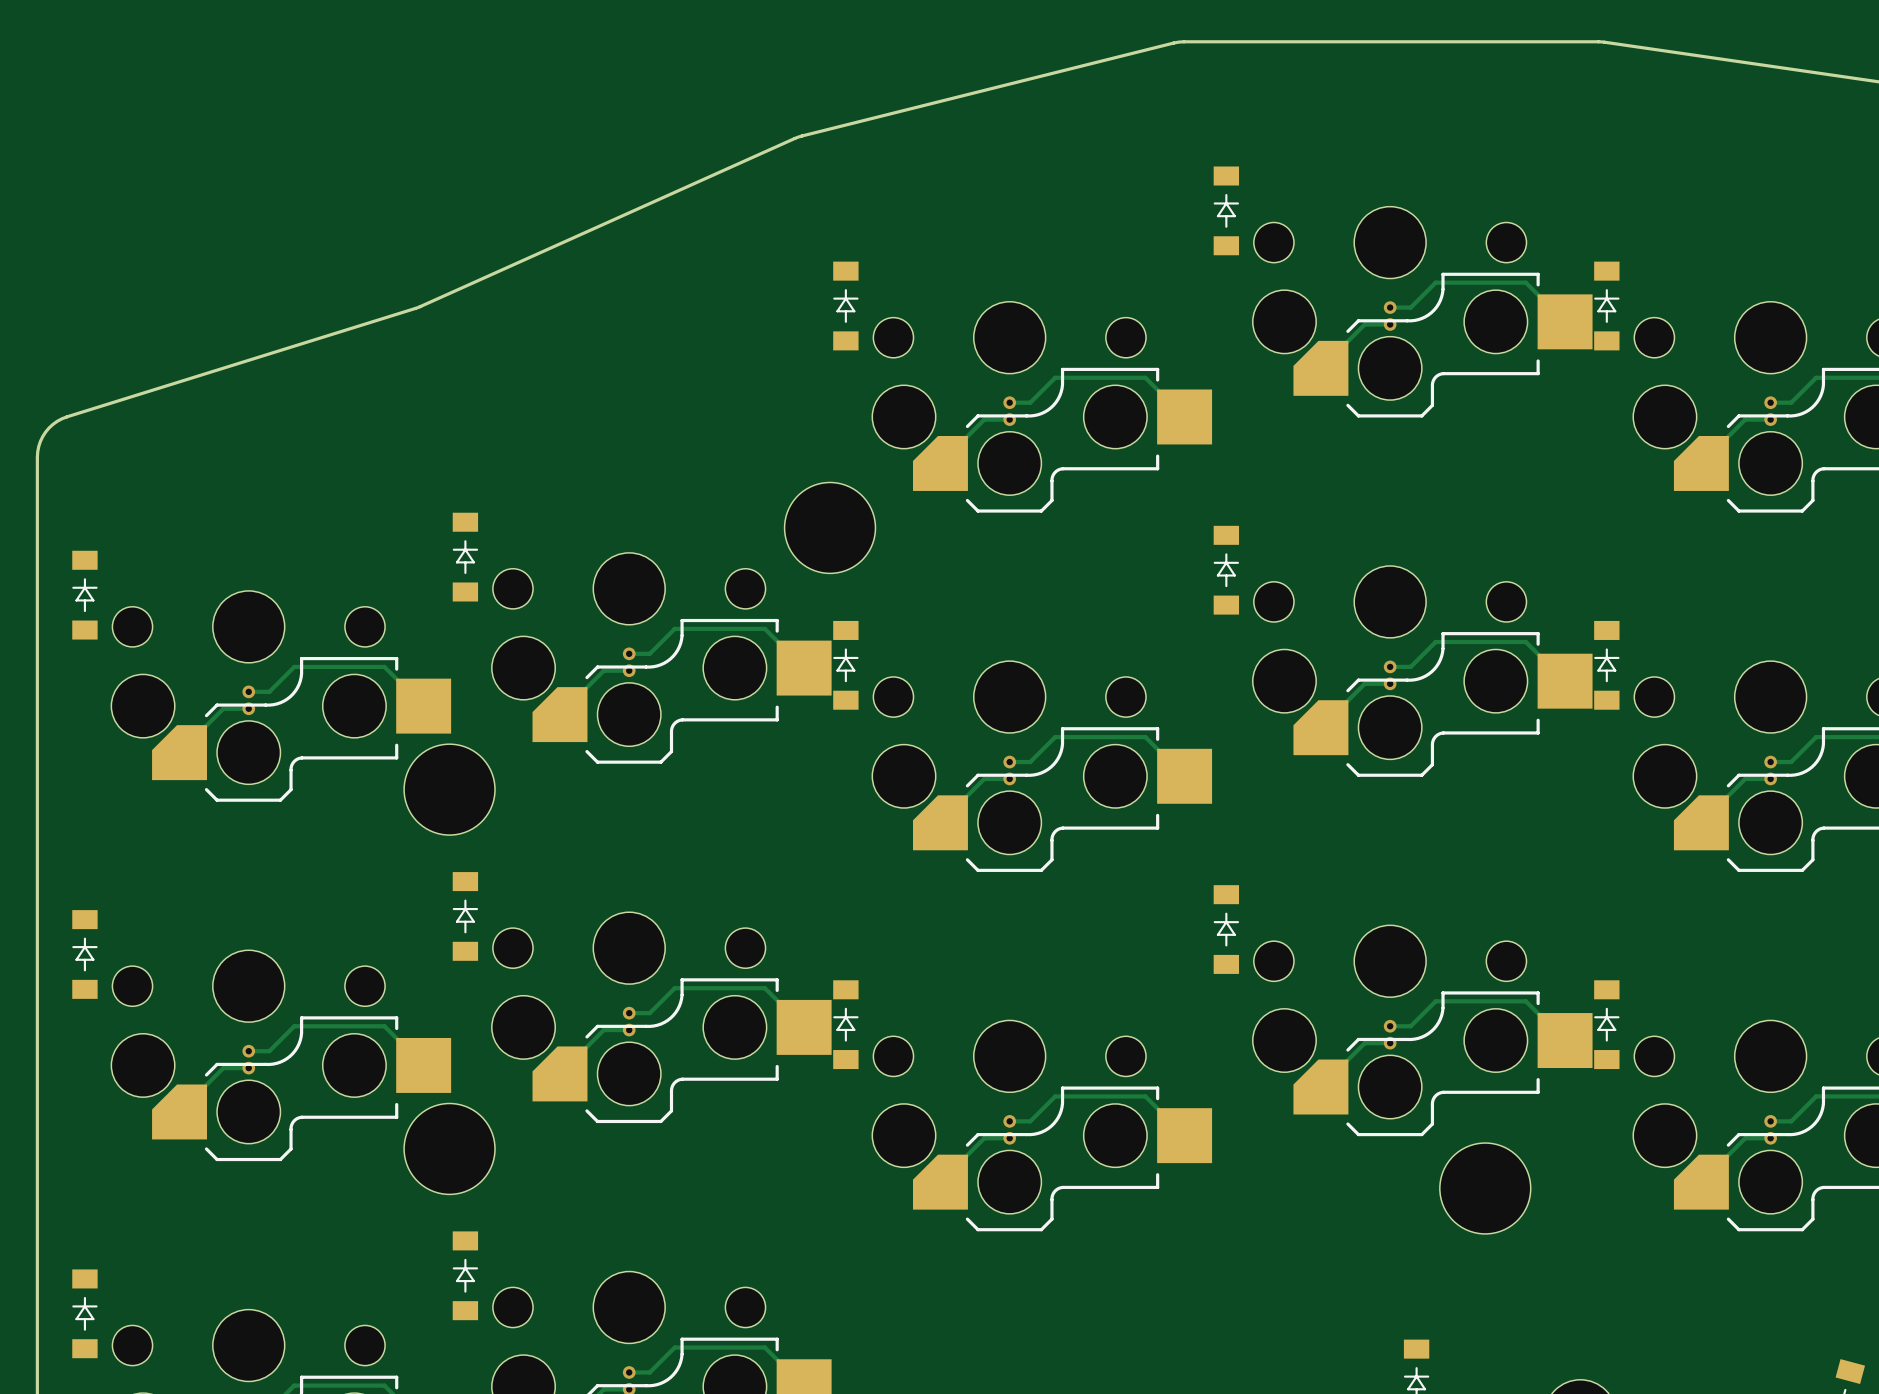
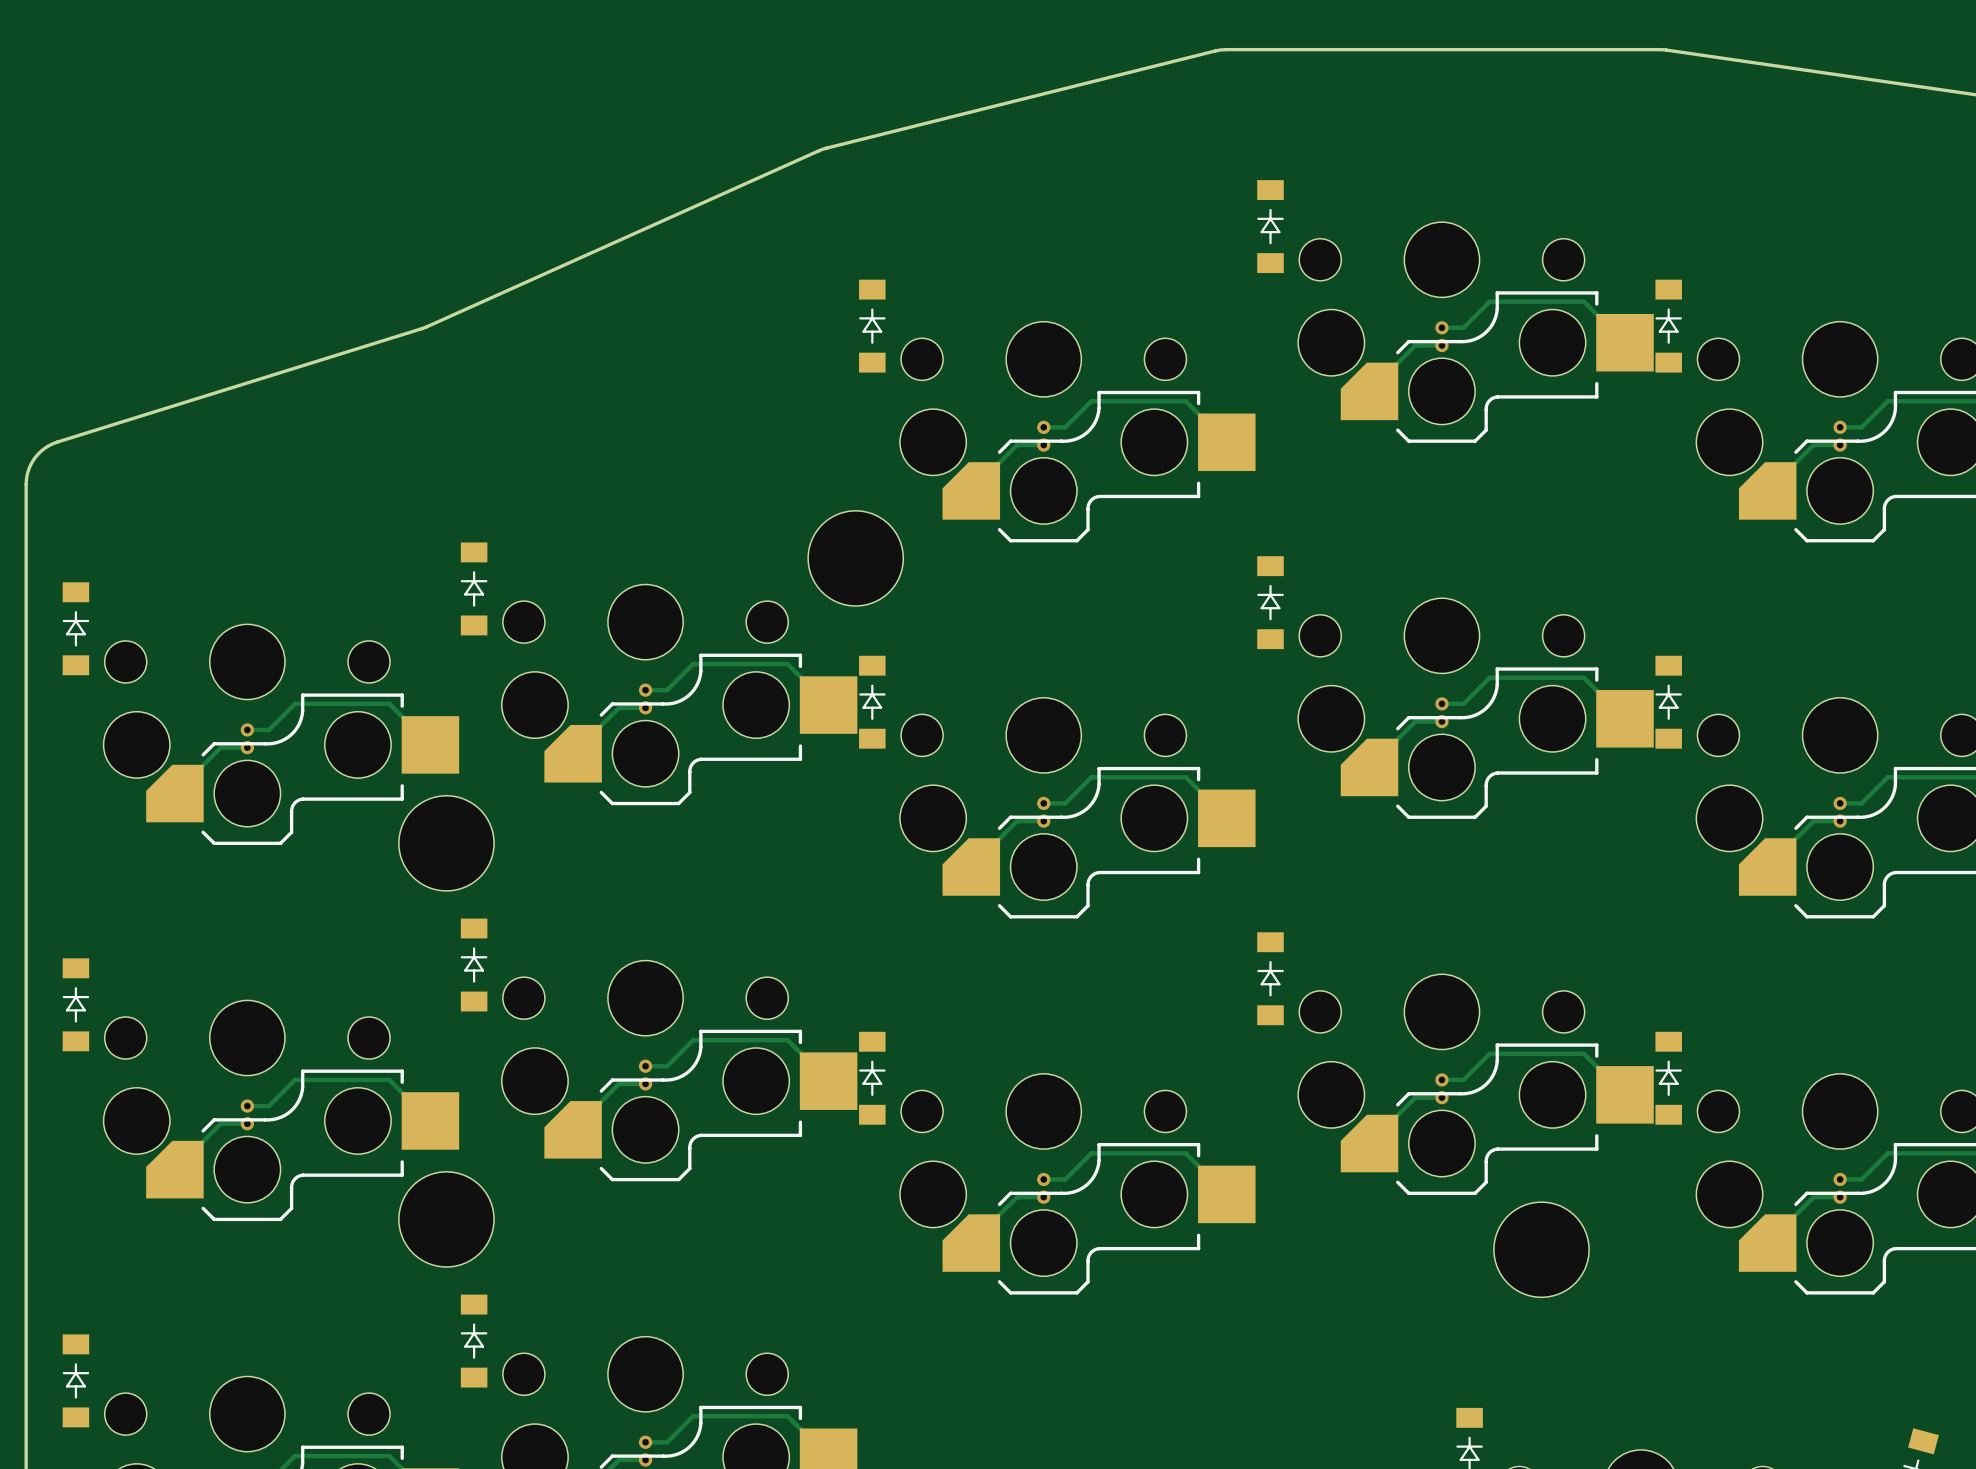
part position: (449, 789) -> (446, 843)
part position: (449, 1148) -> (446, 1219)

